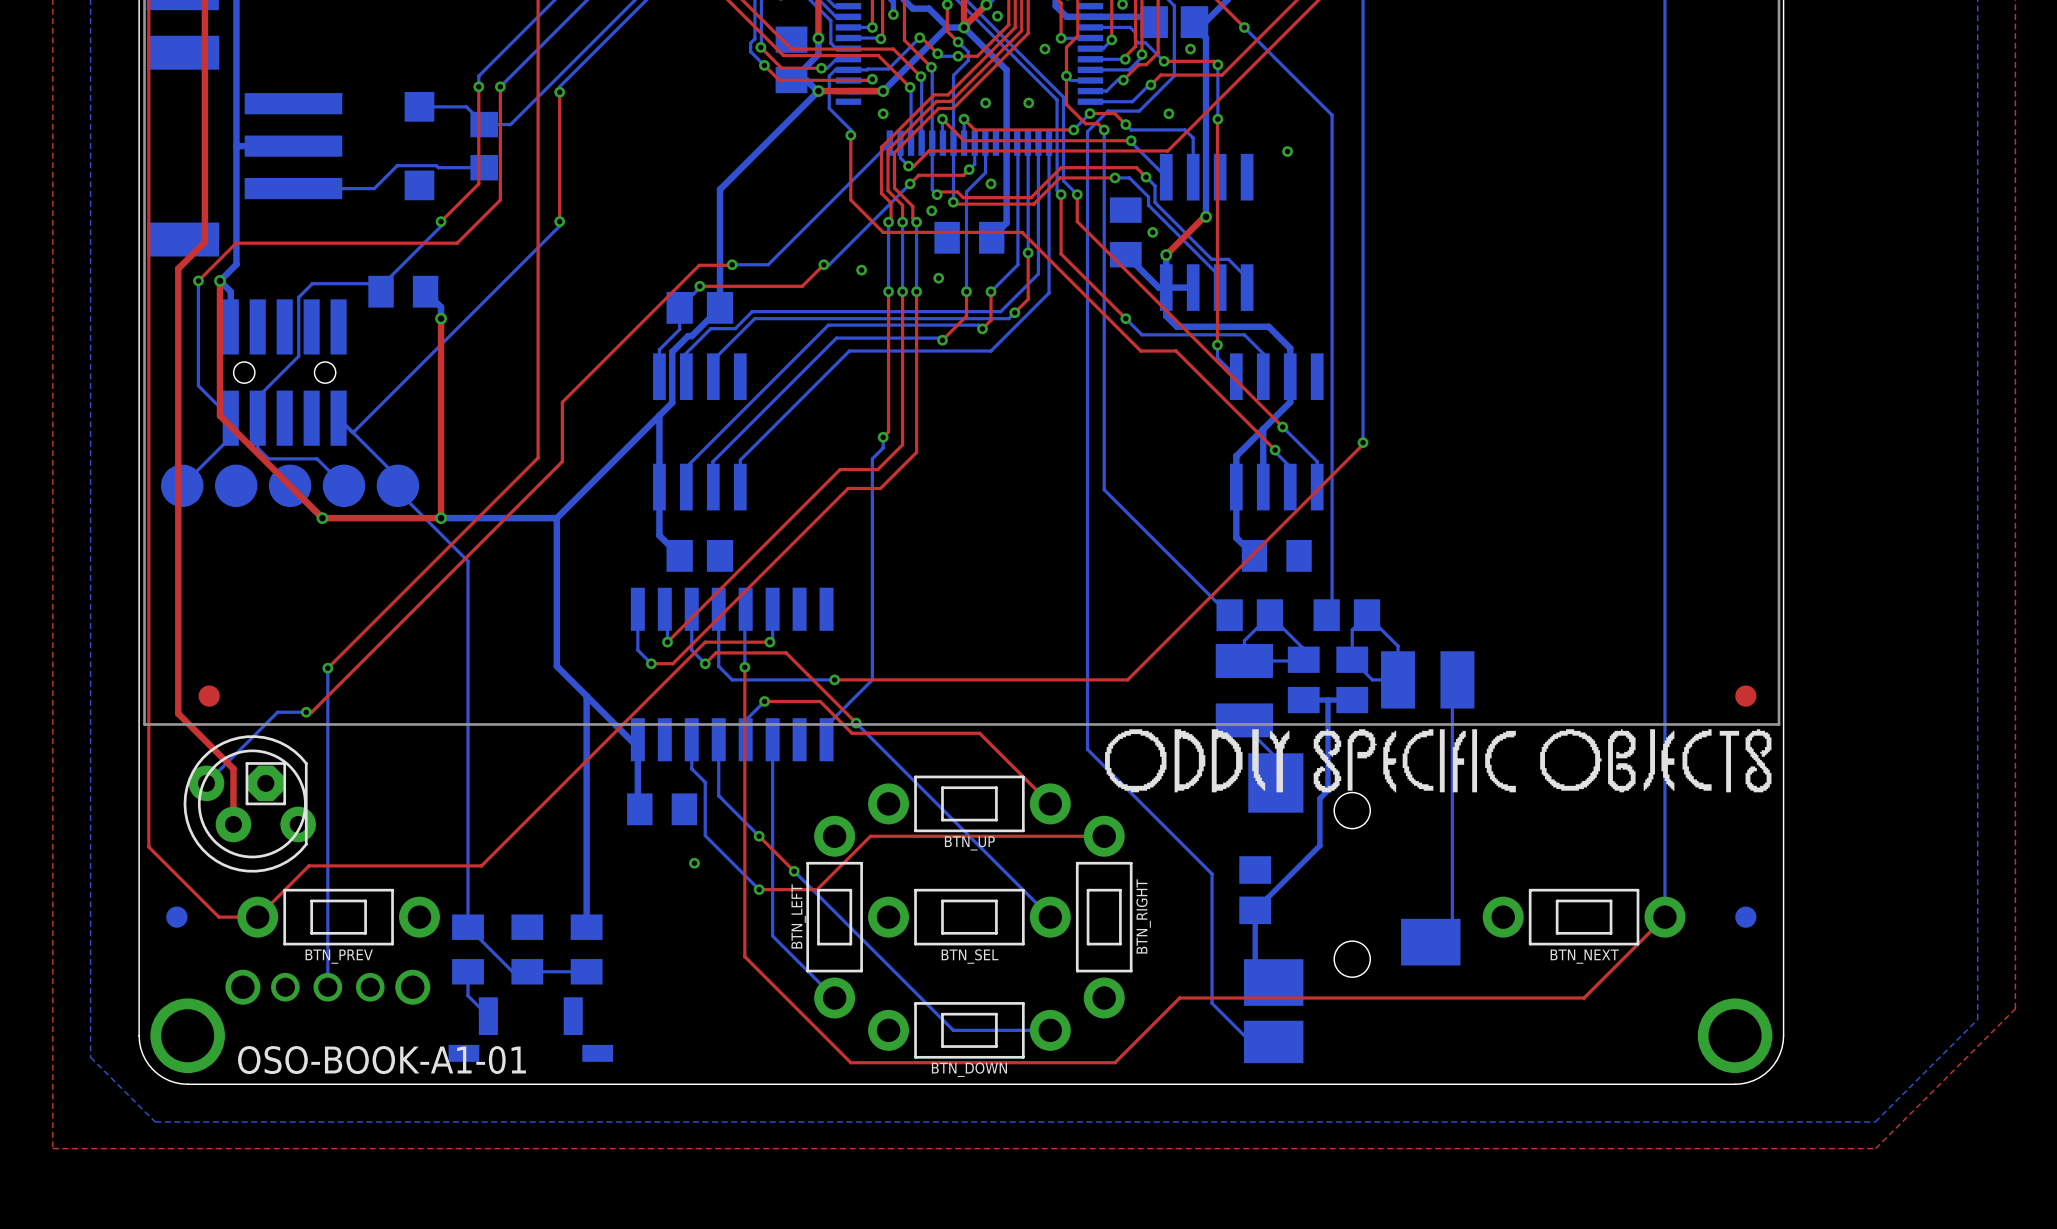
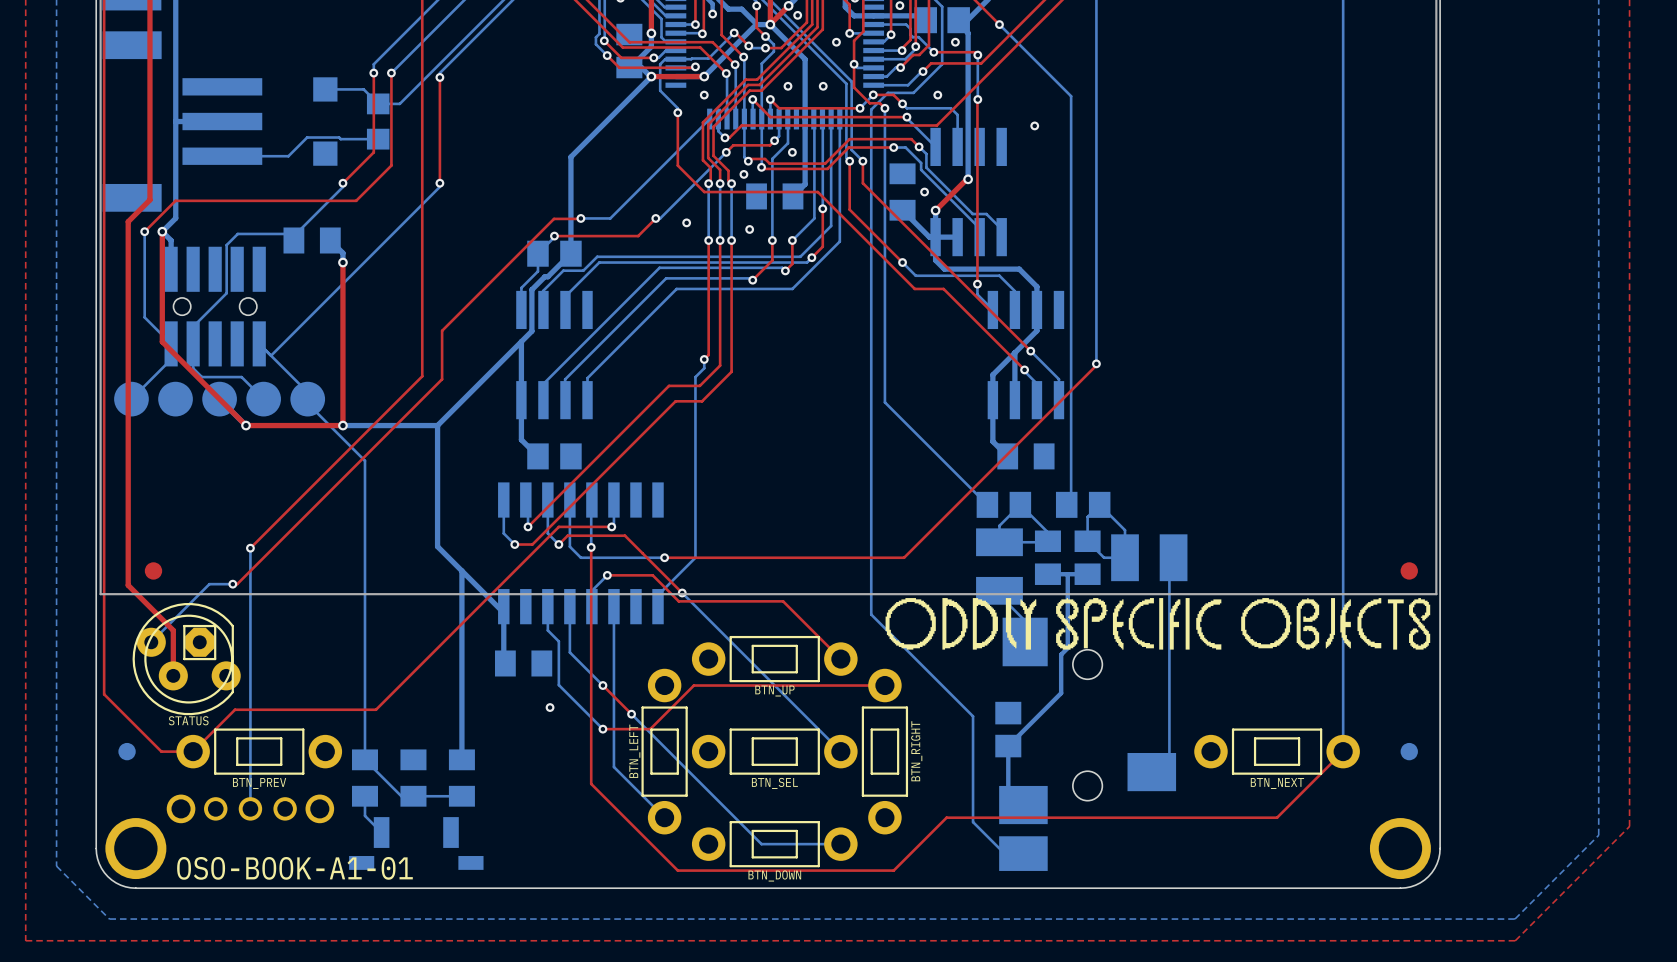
STATUS name: none -> STATUS (188, 720)

